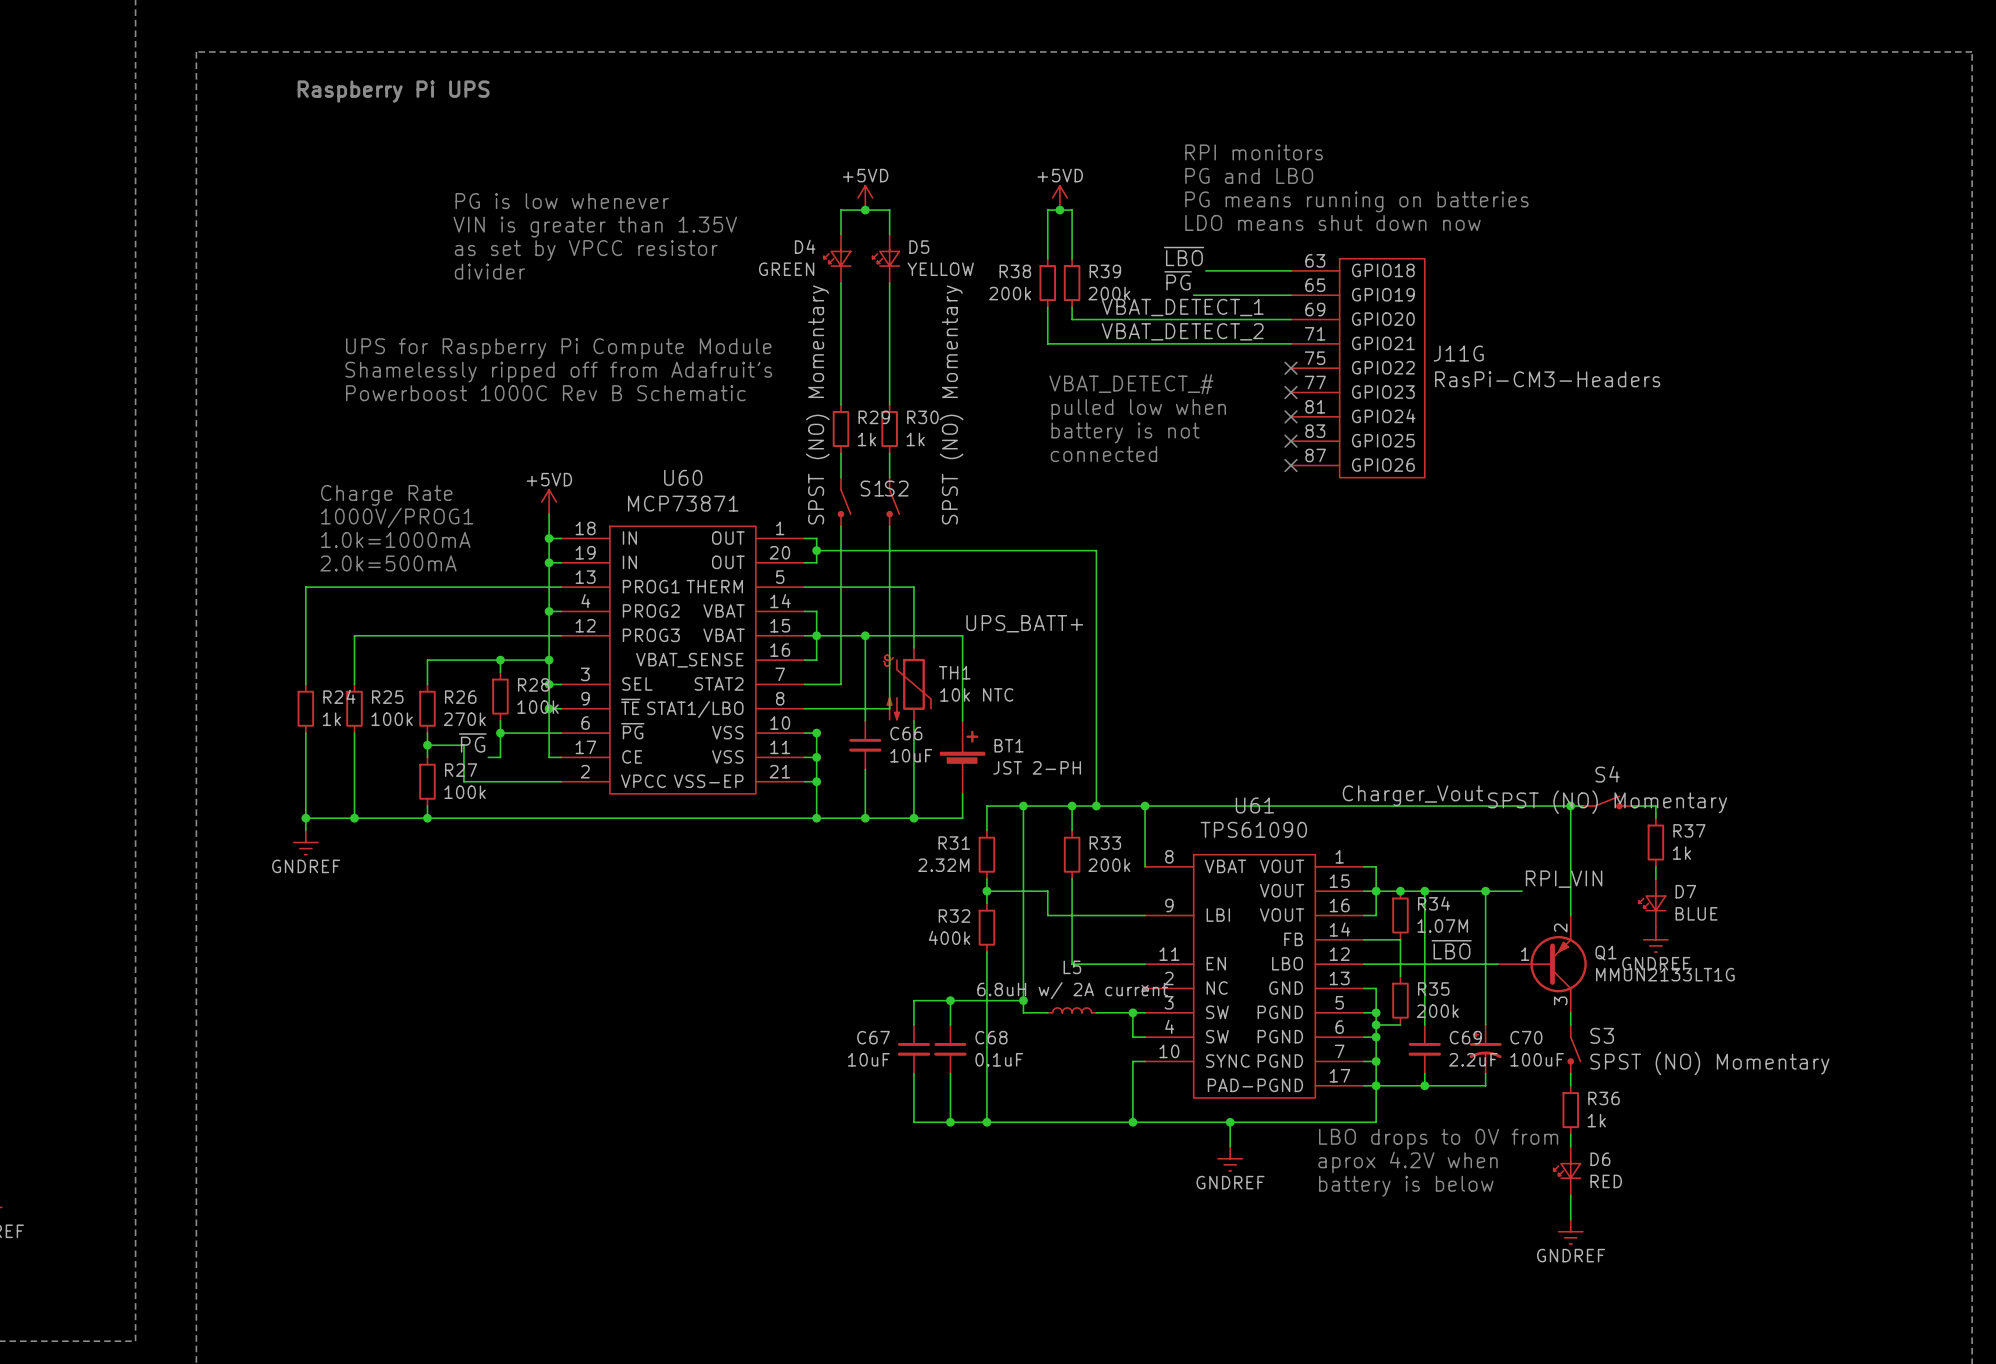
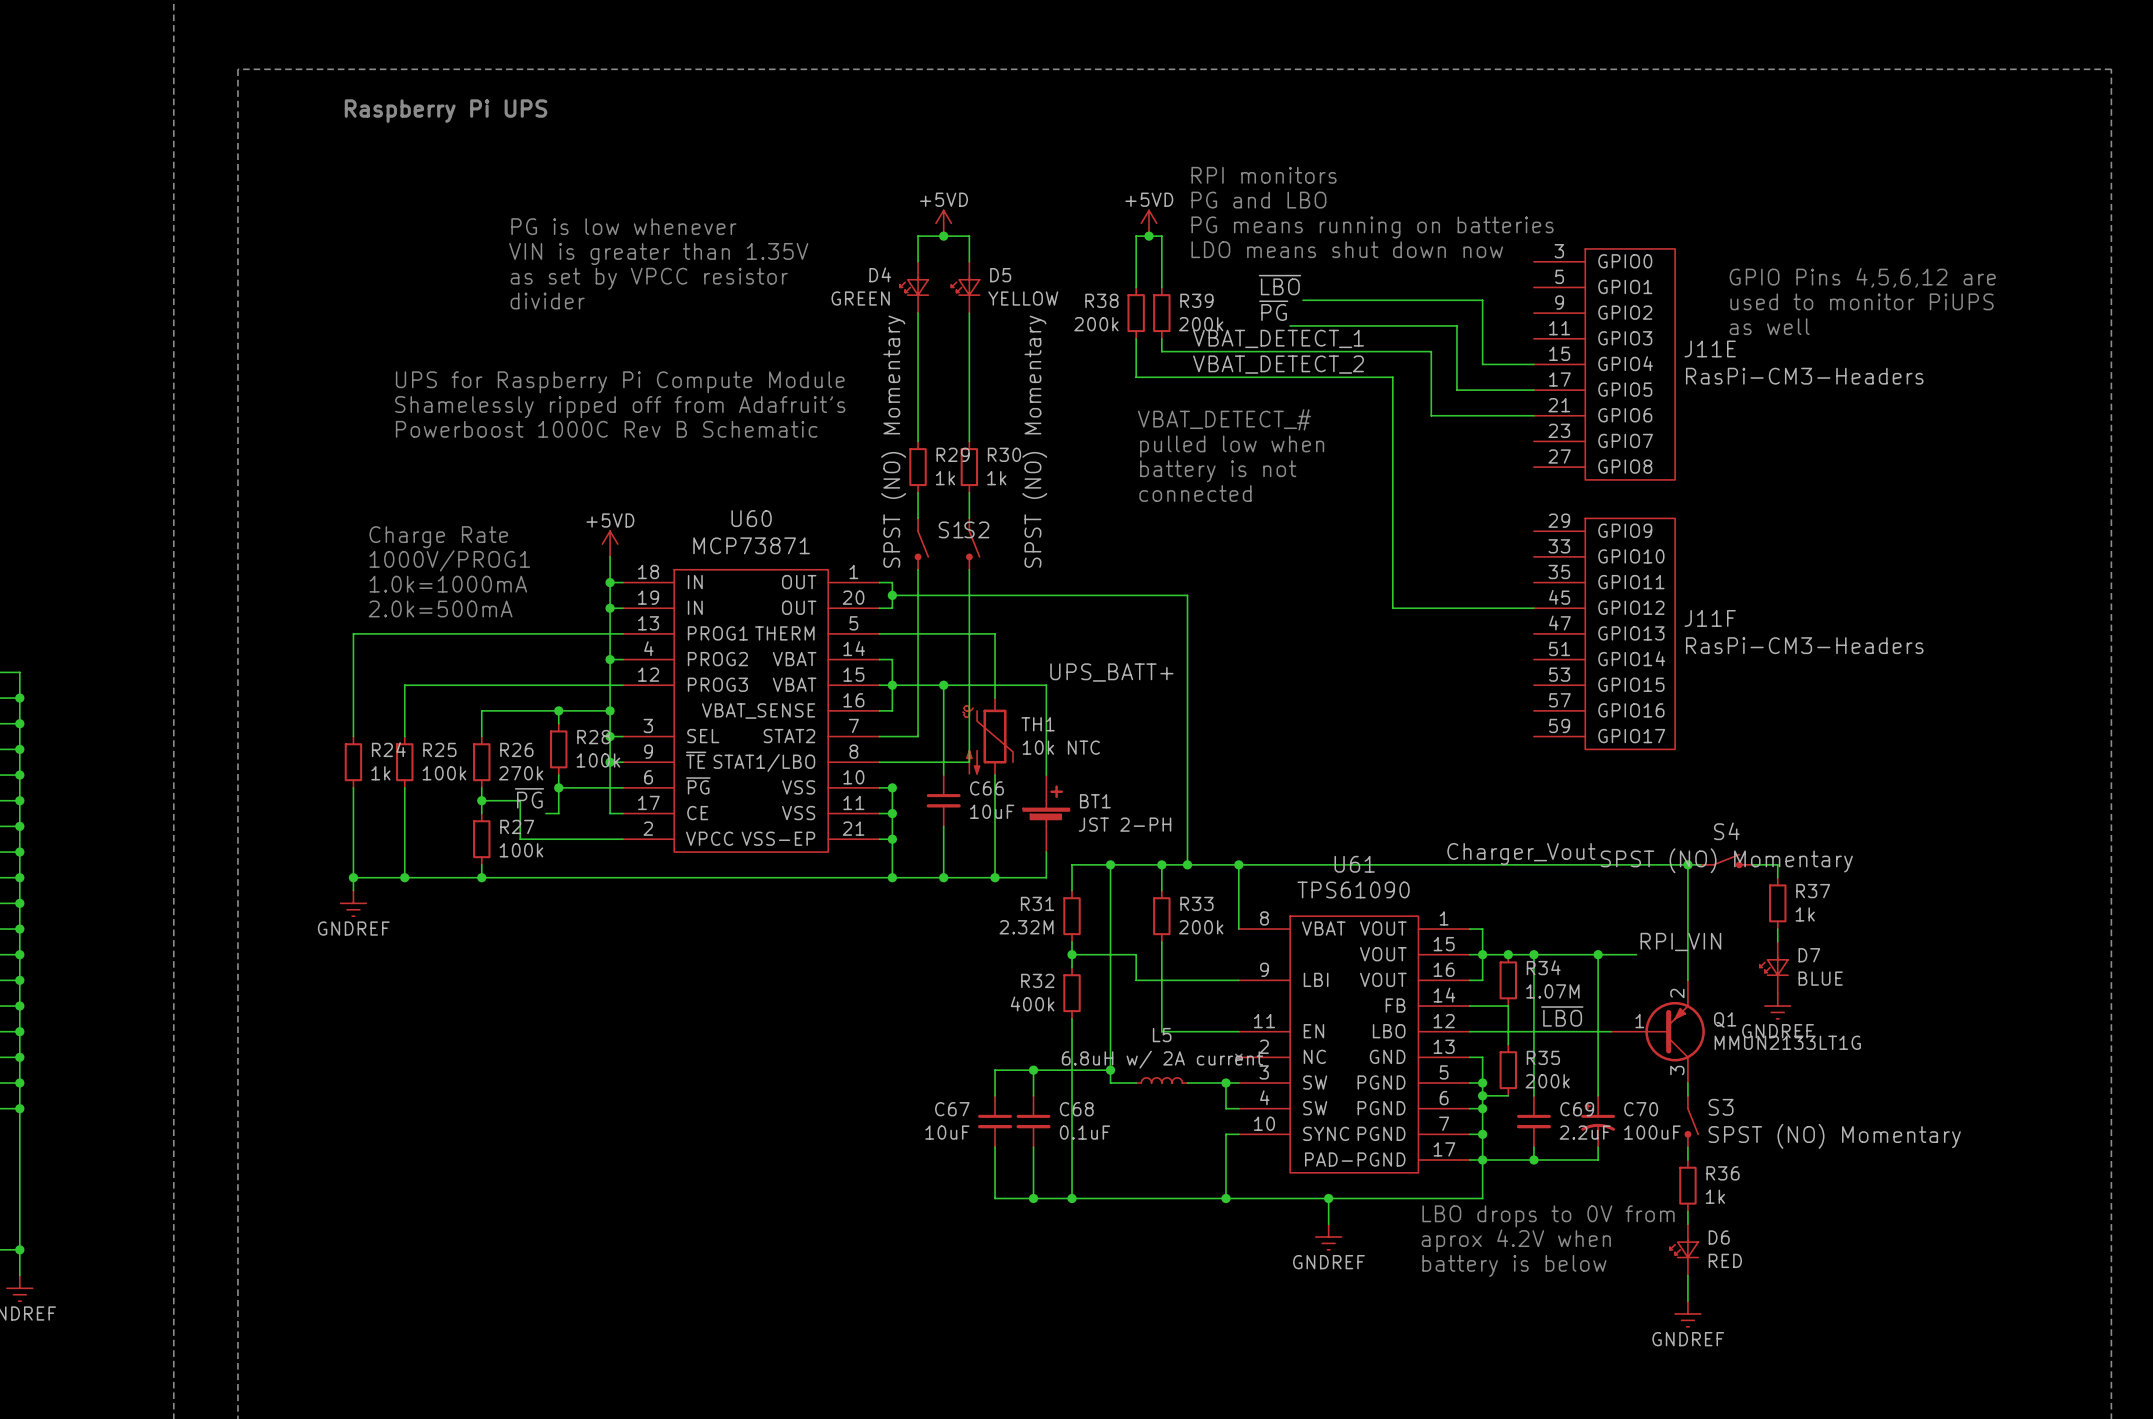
text position: RPI monitors (1254, 152) -> RPI monitors (1264, 175)
text position: PG and LBO (1249, 175) -> PG and LBO (1258, 200)
text position: PG means running on batteries (1356, 201) -> PG means running on batteries (1372, 227)
text position: LDO means shut down now (1332, 222) -> LDO means shut down now (1347, 249)
text: none -> GPIO Pins 4,5,6,12 are (1862, 277)
wire: none -> (1392, 300) (1482, 300) (1482, 364) (1533, 364)
text: none -> used to monitor PiUPS (1861, 301)
wire: none -> (1392, 325) (1456, 325) (1456, 390) (1533, 390)
text: none -> as well (1769, 326)
wire: none -> (1392, 351) (1431, 351) (1431, 415) (1533, 415)
J11E: none -> RasPi-CM3-Headers (1604, 364)
wire: none -> (1392, 377) (1392, 608) (1533, 608)
no-connect mark: (1291, 368) -> none
J11G: RasPi-CM3-Headers (1357, 368) -> none
no-connect mark: (1291, 392) -> none
no-connect mark: (1291, 416) -> none
no-connect mark: (1291, 441) -> none
no-connect mark: (1291, 465) -> none
J11F: none -> RasPi-CM3-Headers (1604, 633)

